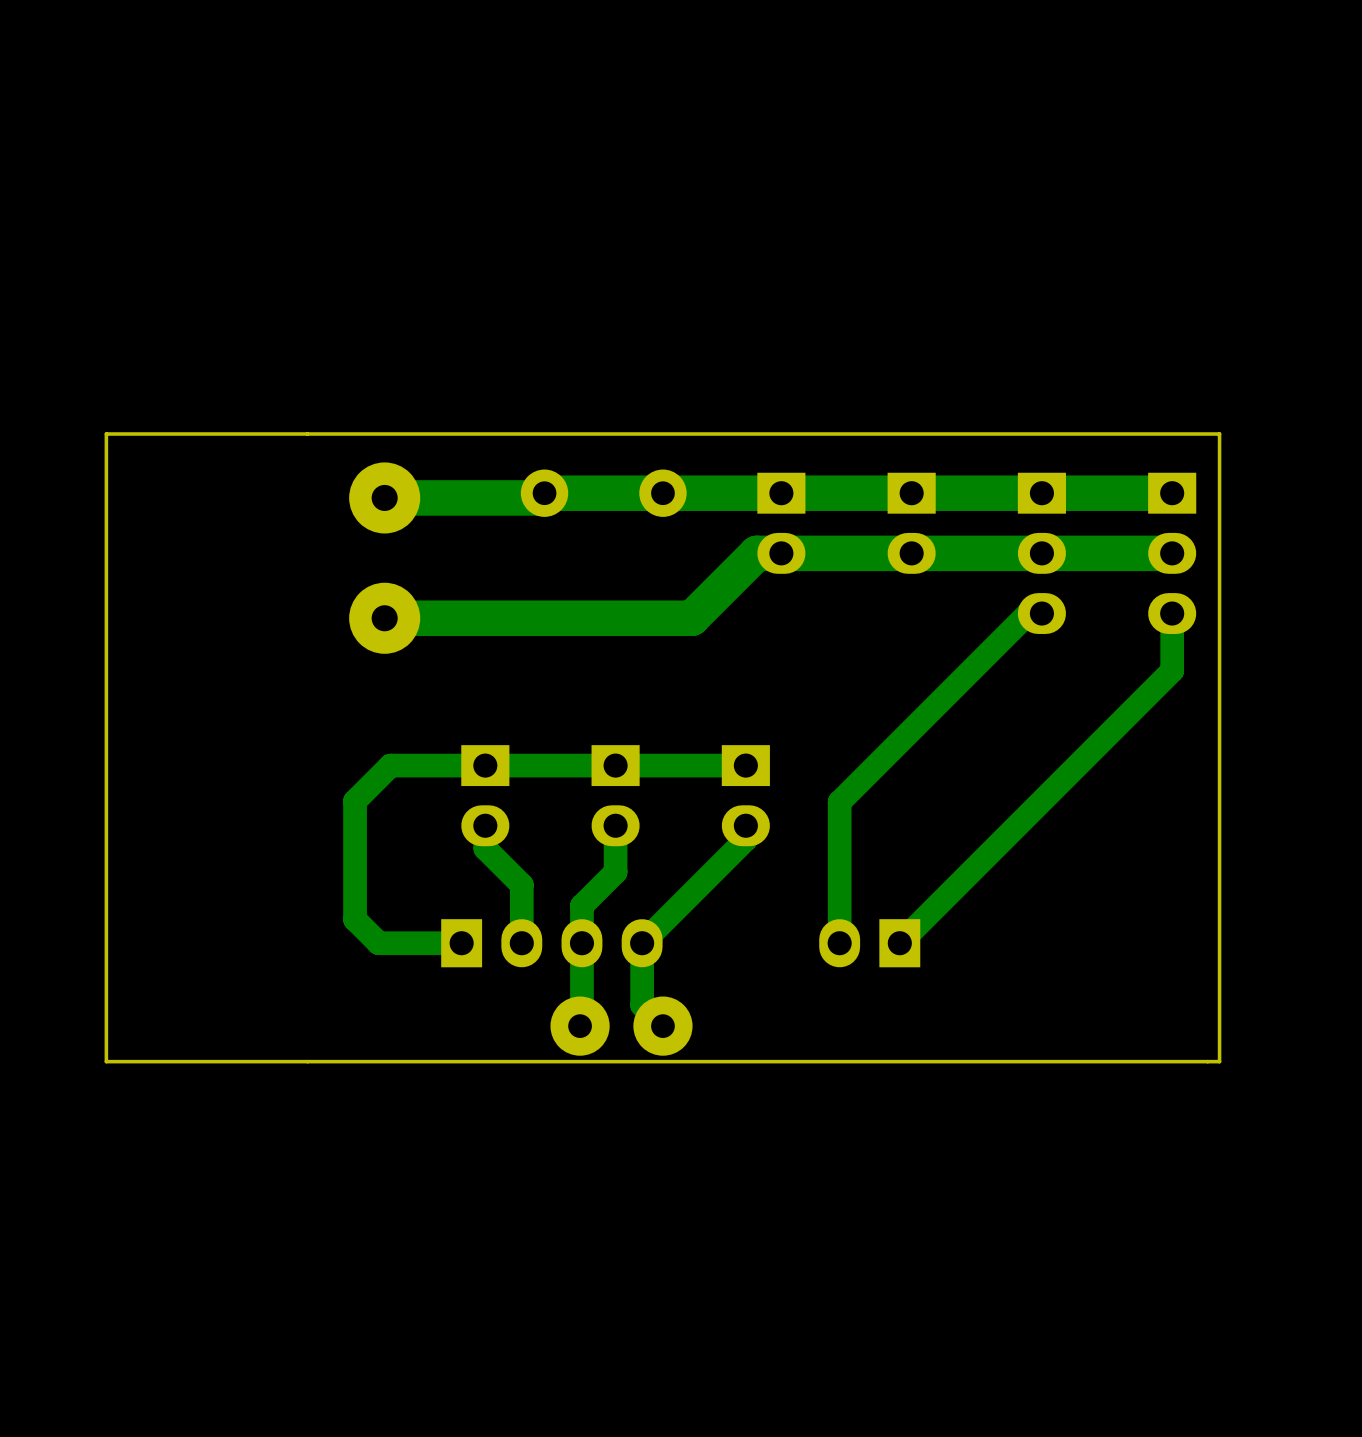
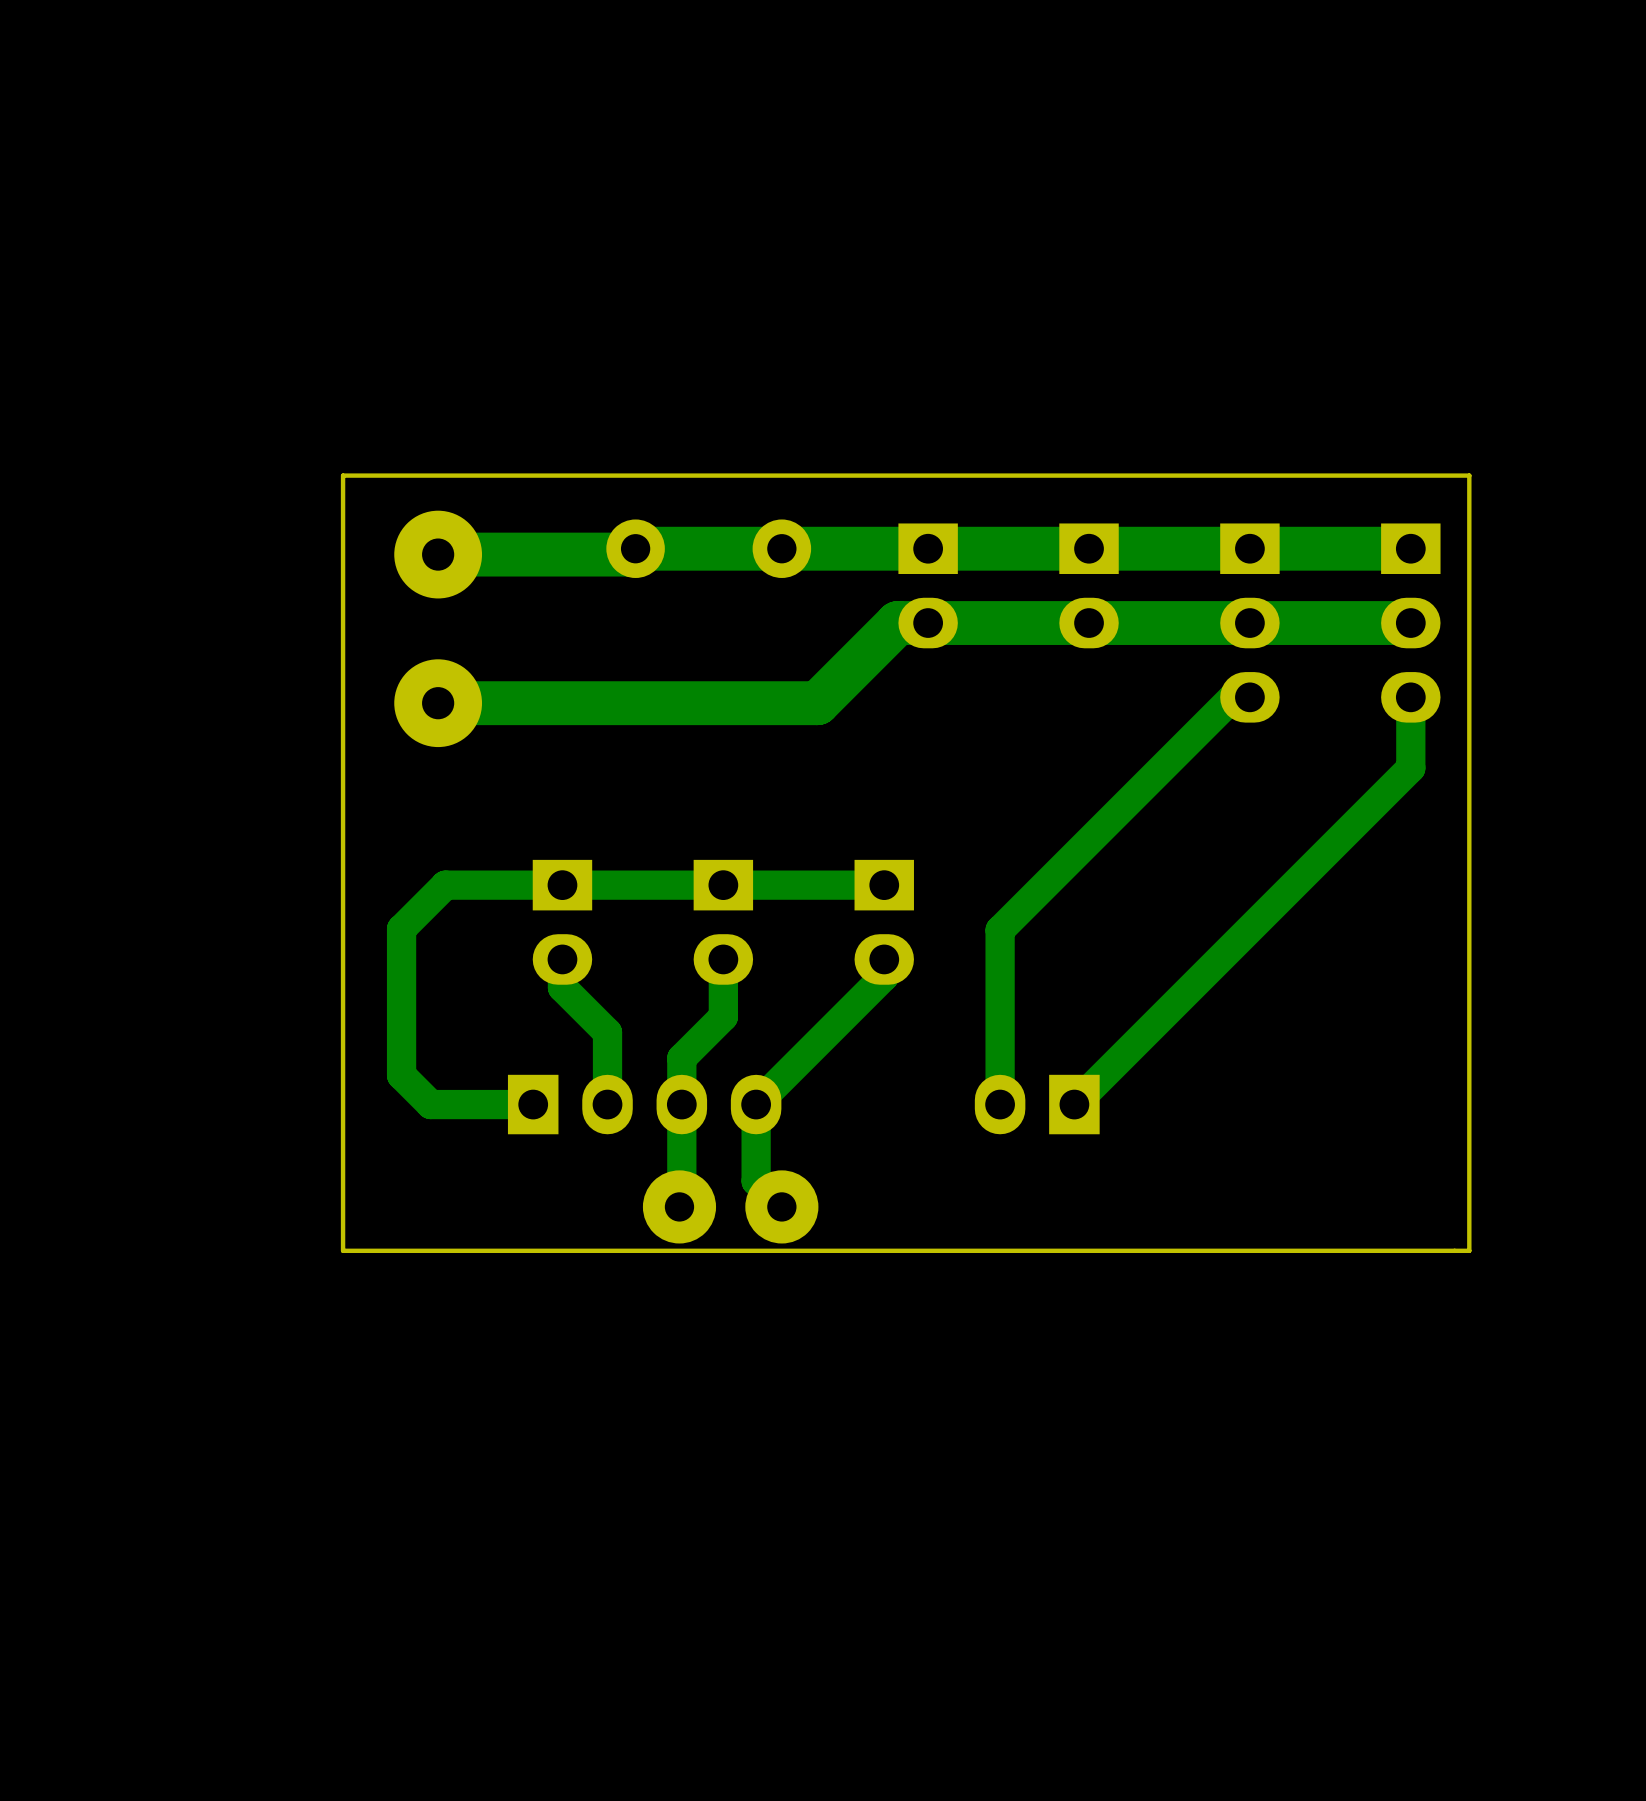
board edge: (307, 434) (106, 434) (106, 1061) (307, 1061) -> (343, 475) (343, 1250)

